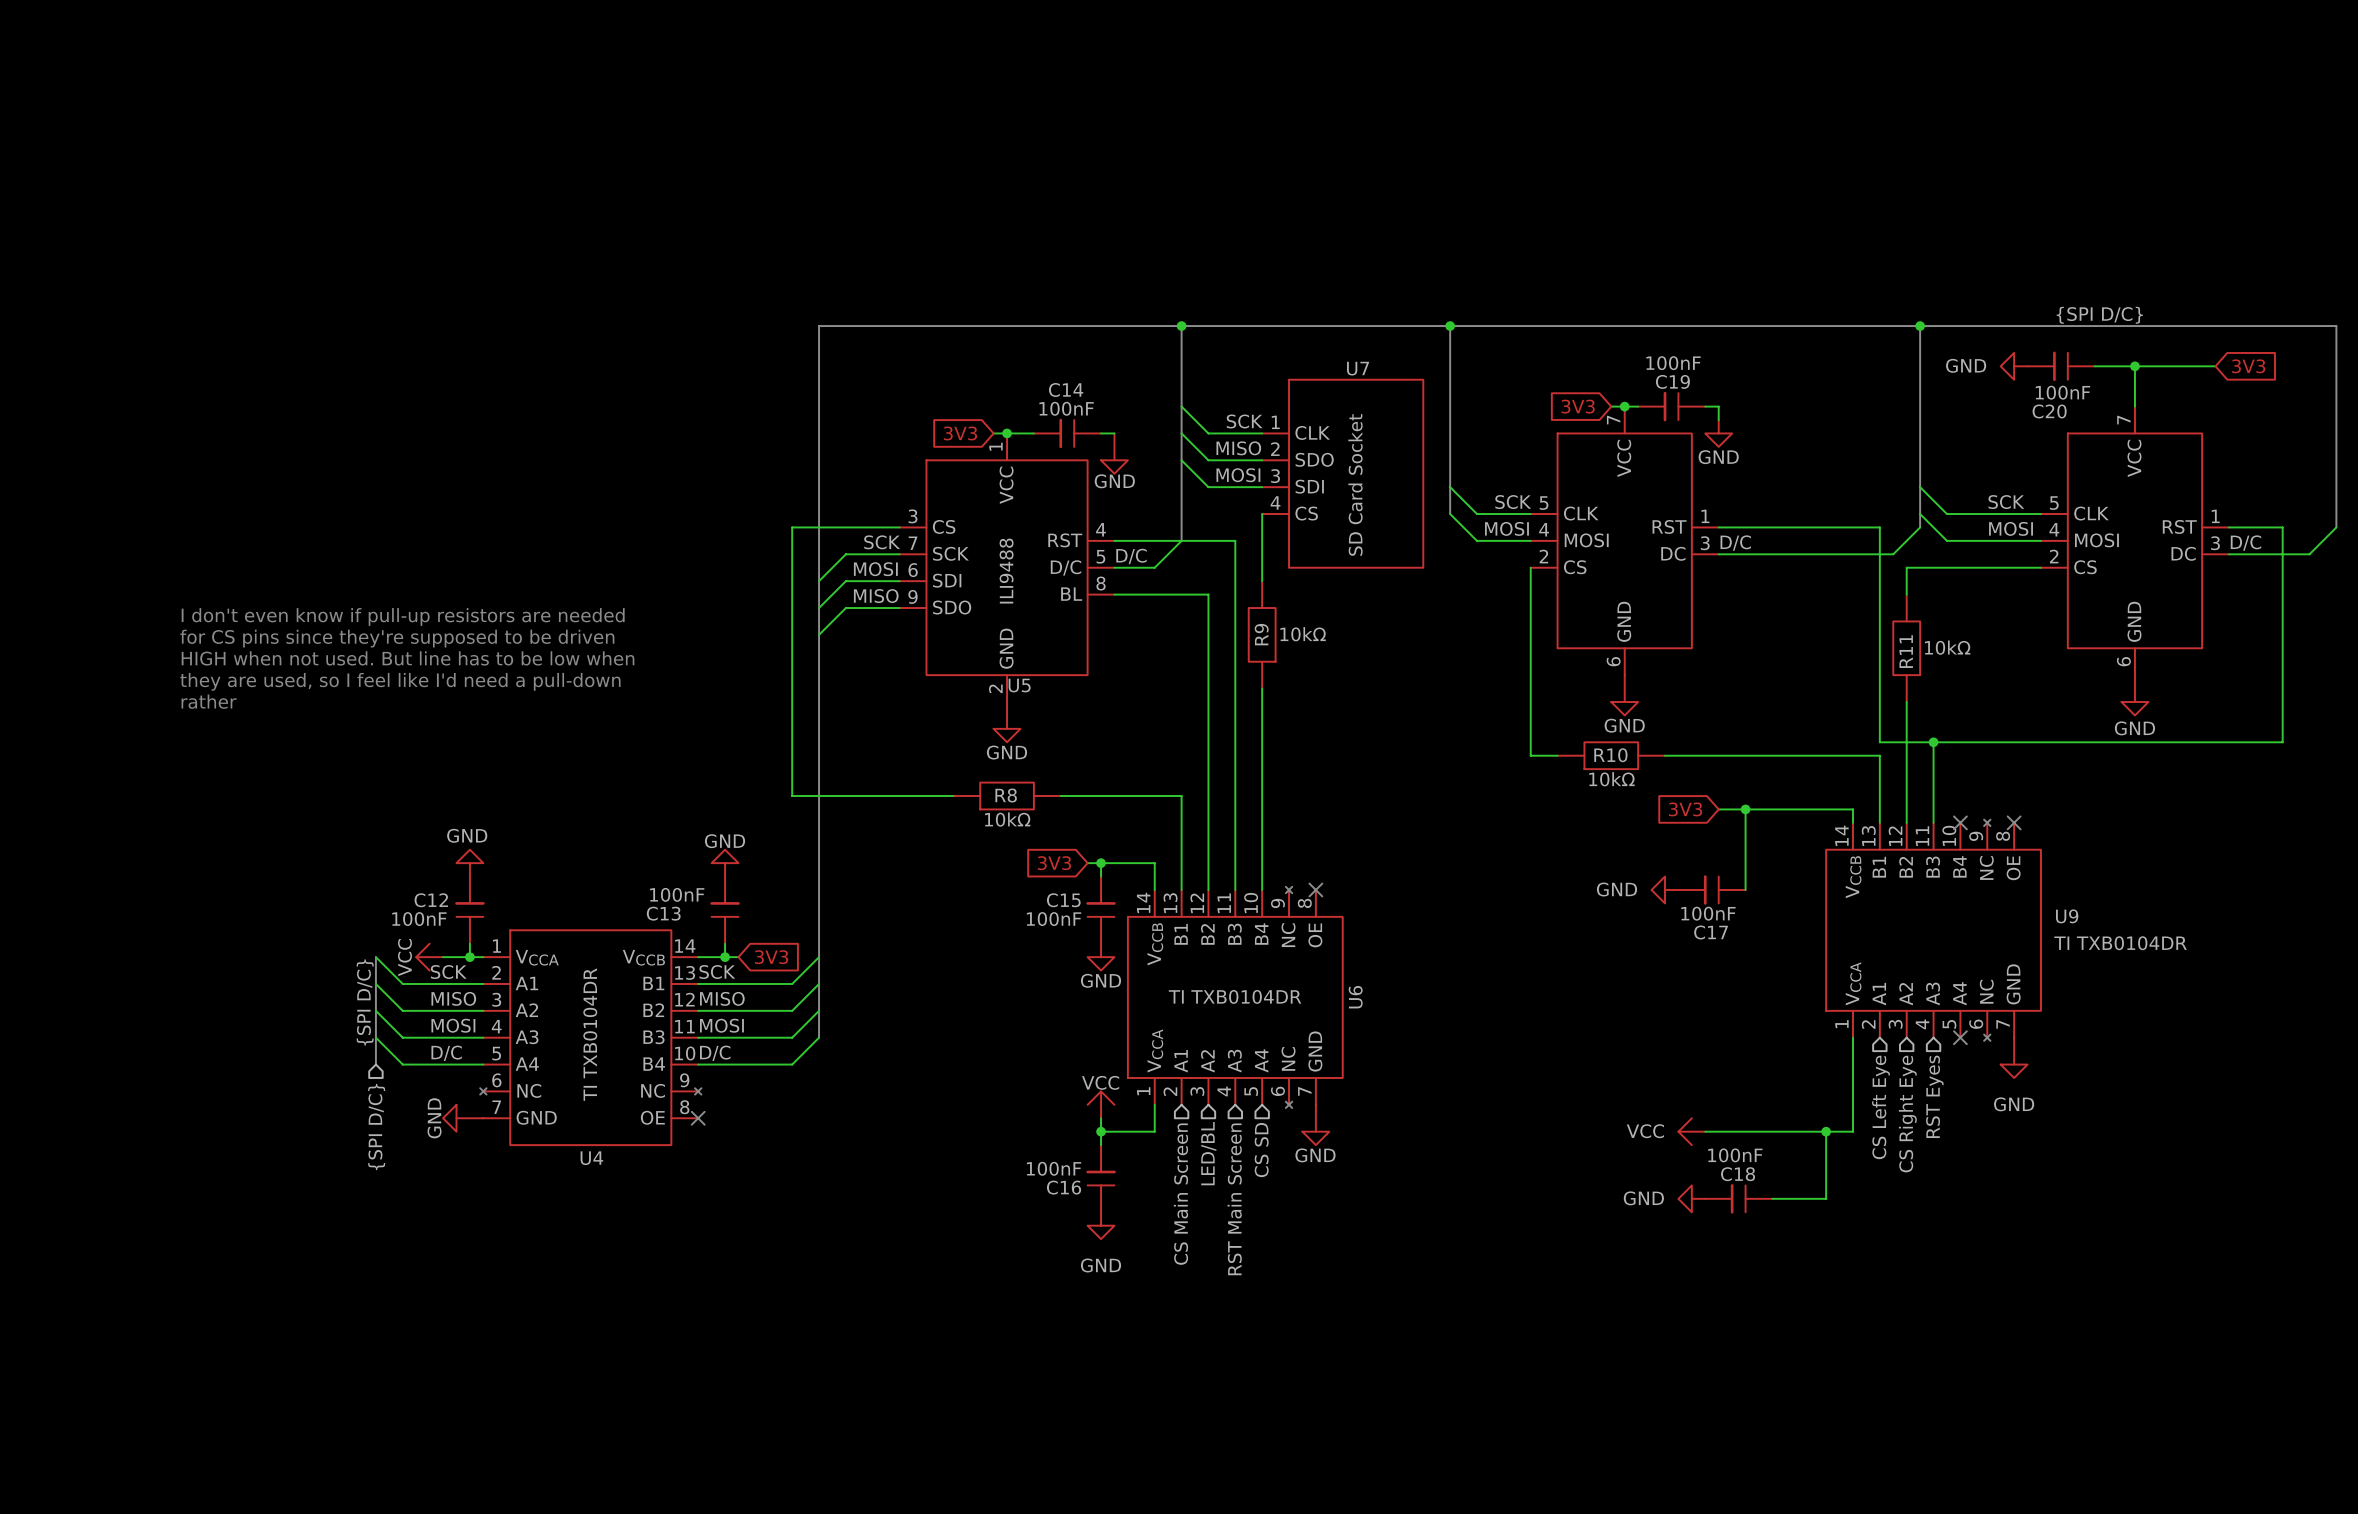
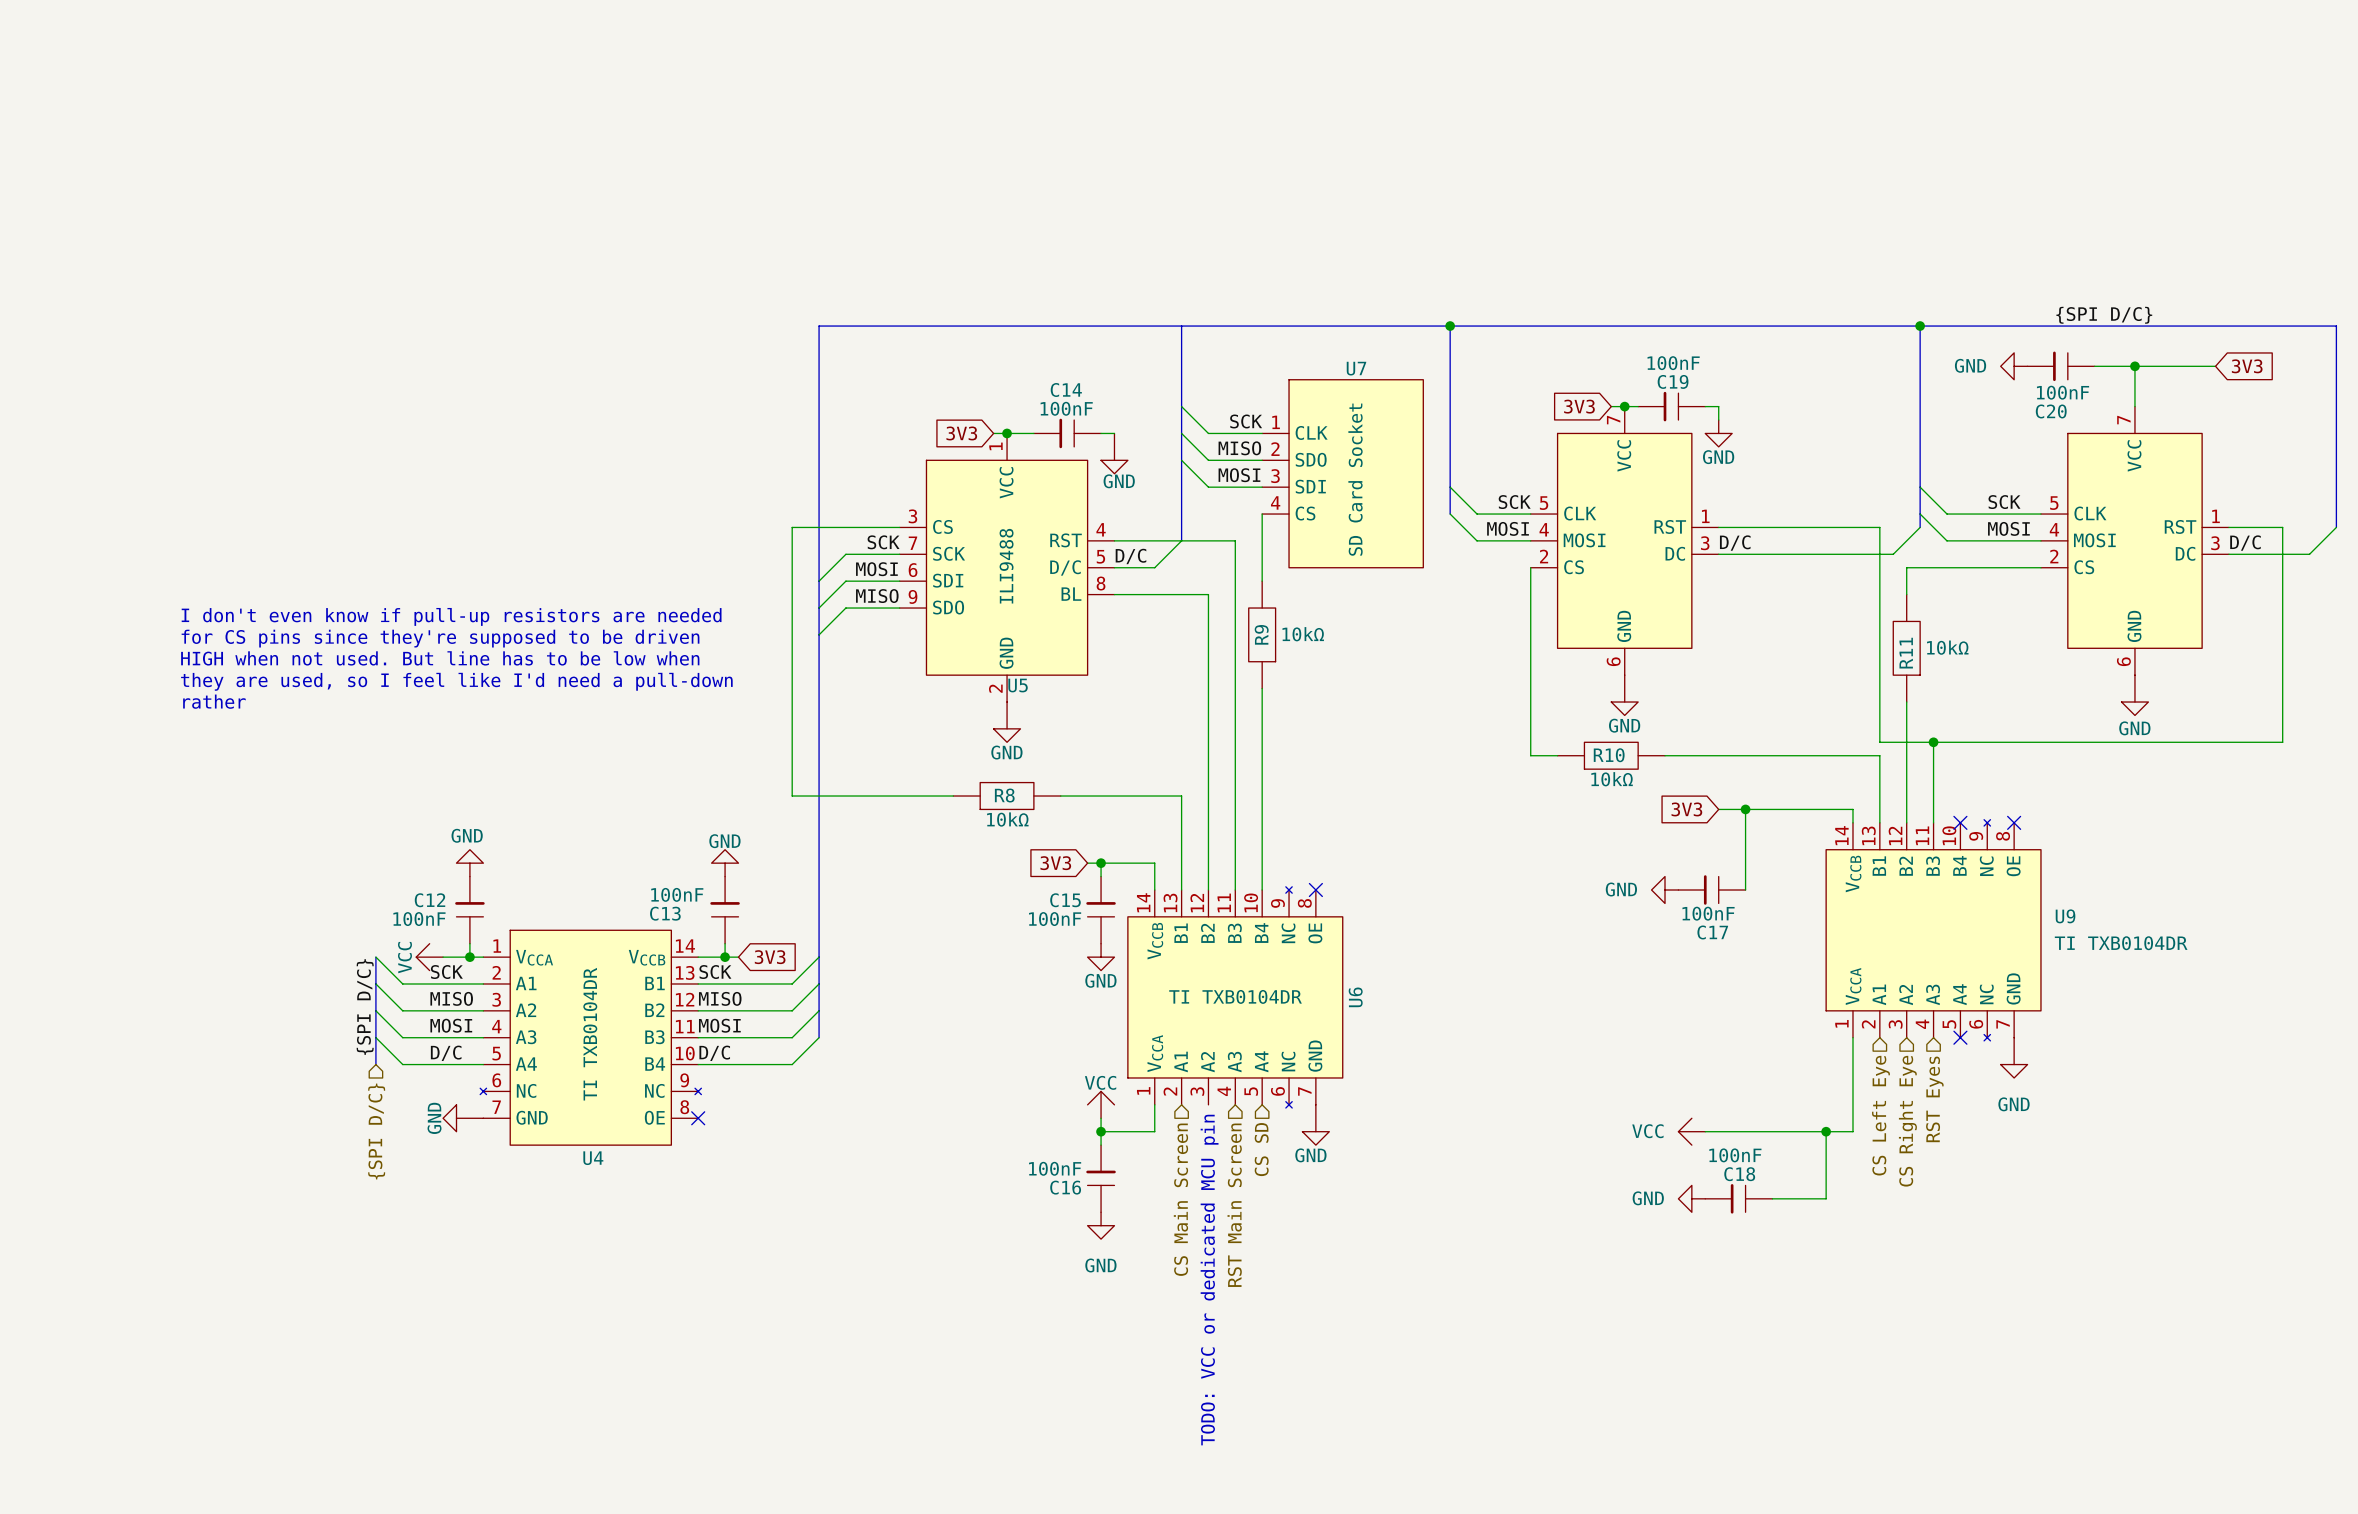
junction: (1181, 326) -> none
hierarchical label: LED/BL (1208, 1153) -> none
text: none -> TODO: VCC or dedicated MCU pin (1209, 1280)

